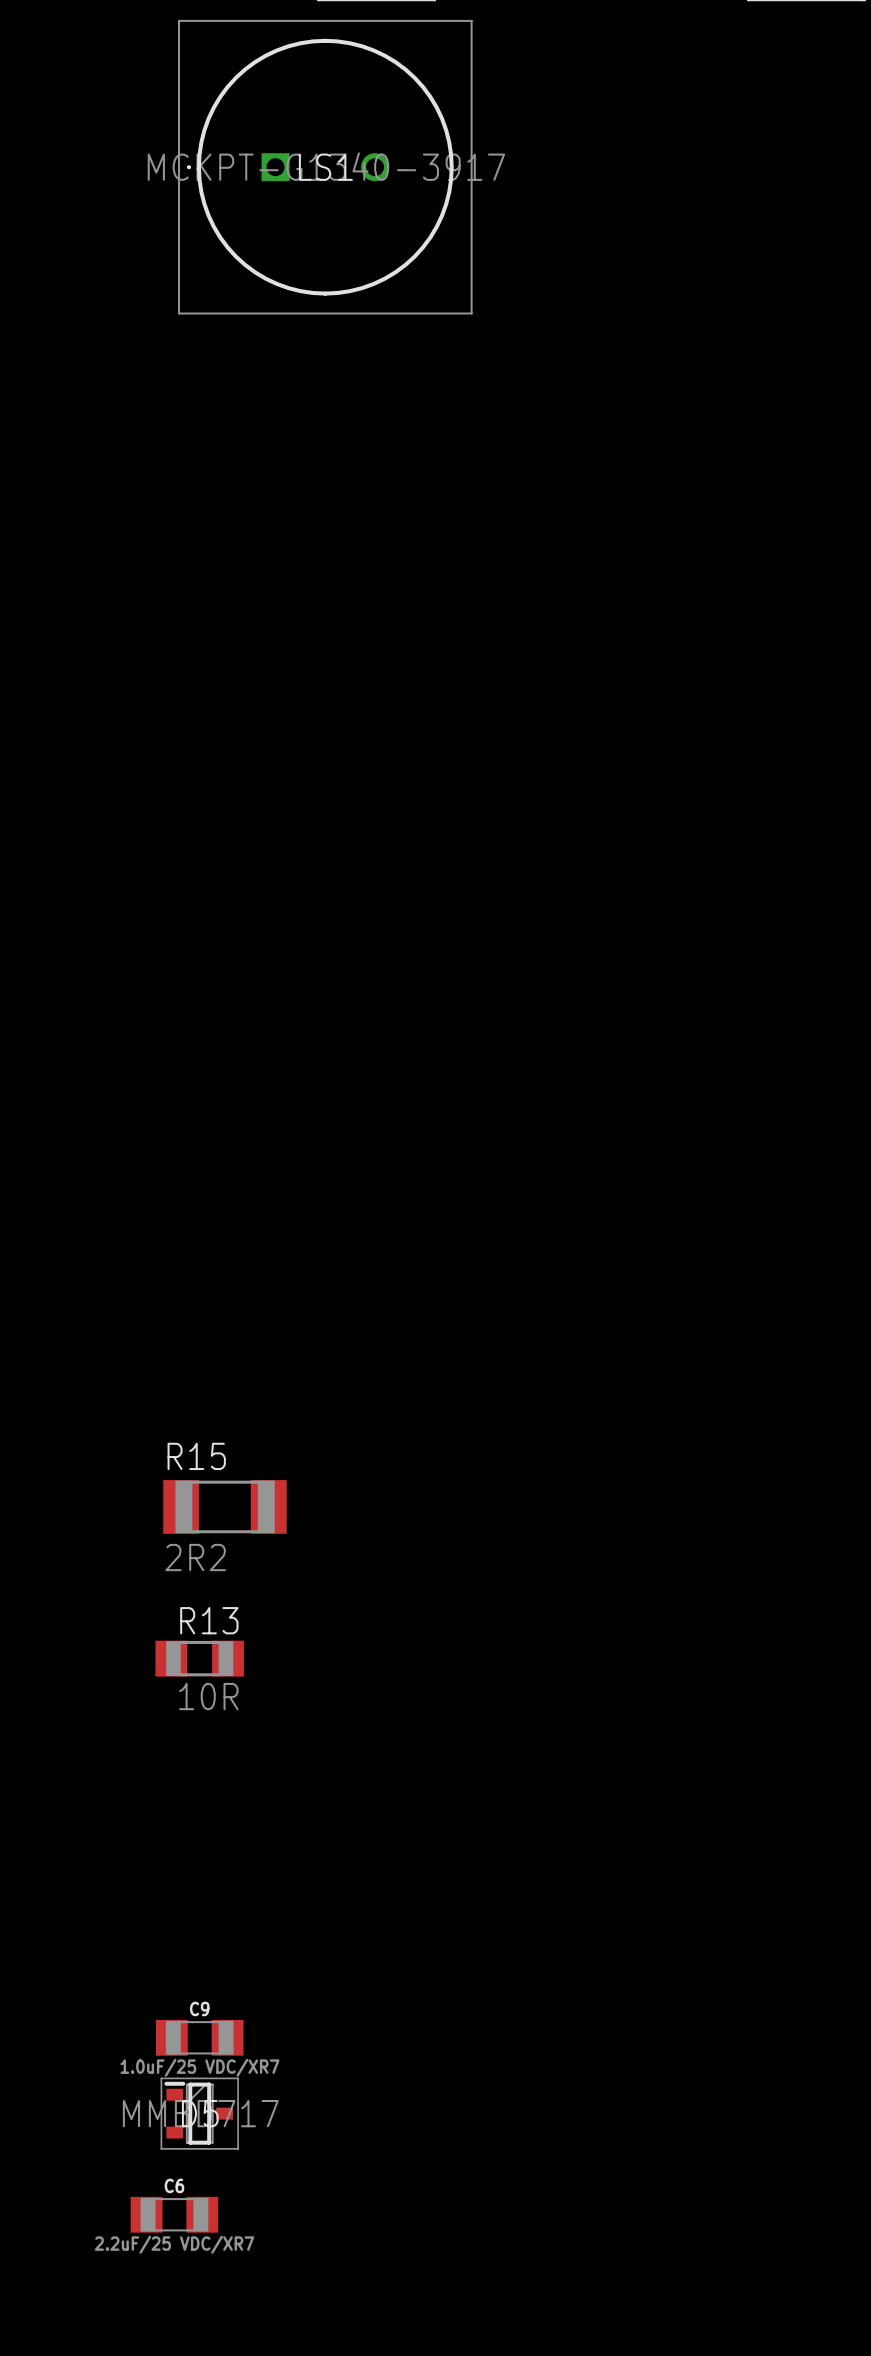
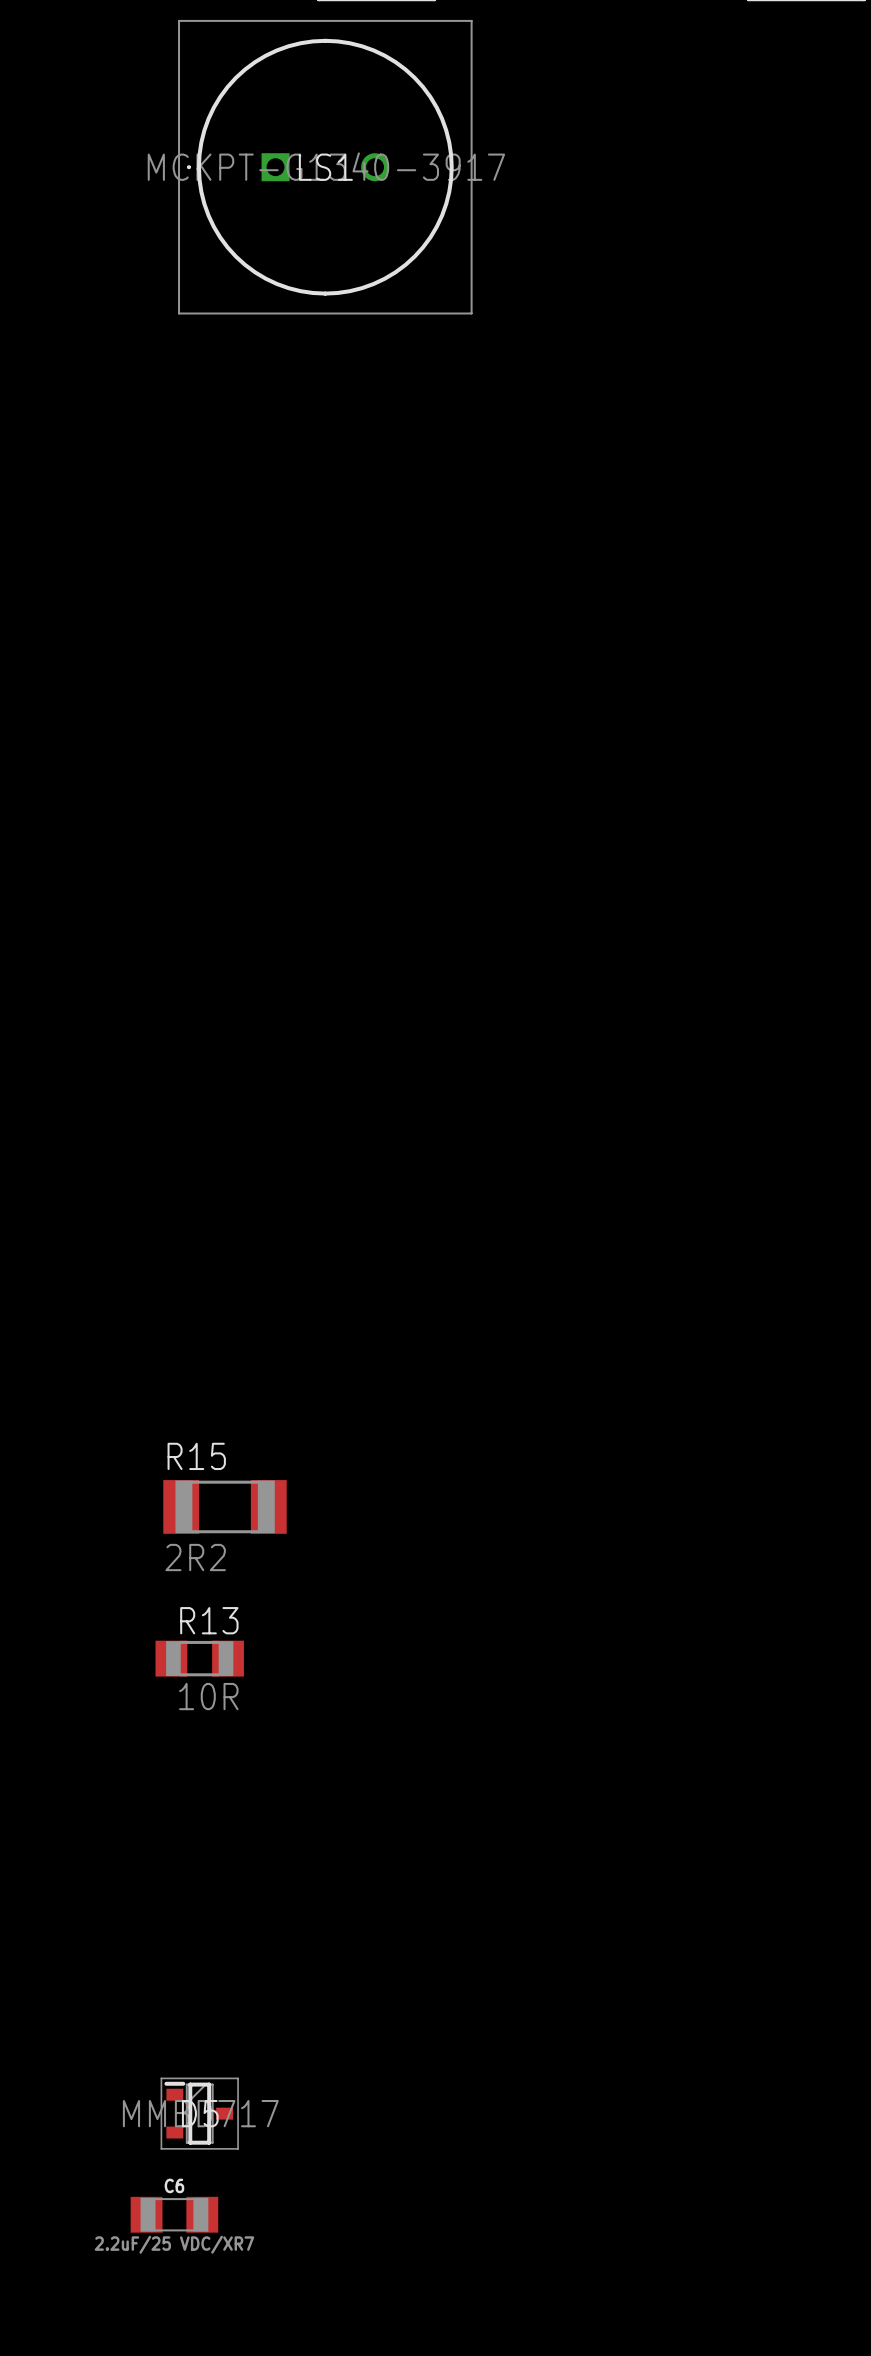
C9: 1.0uF/25 VDC/XR7 (199, 2037) -> none

